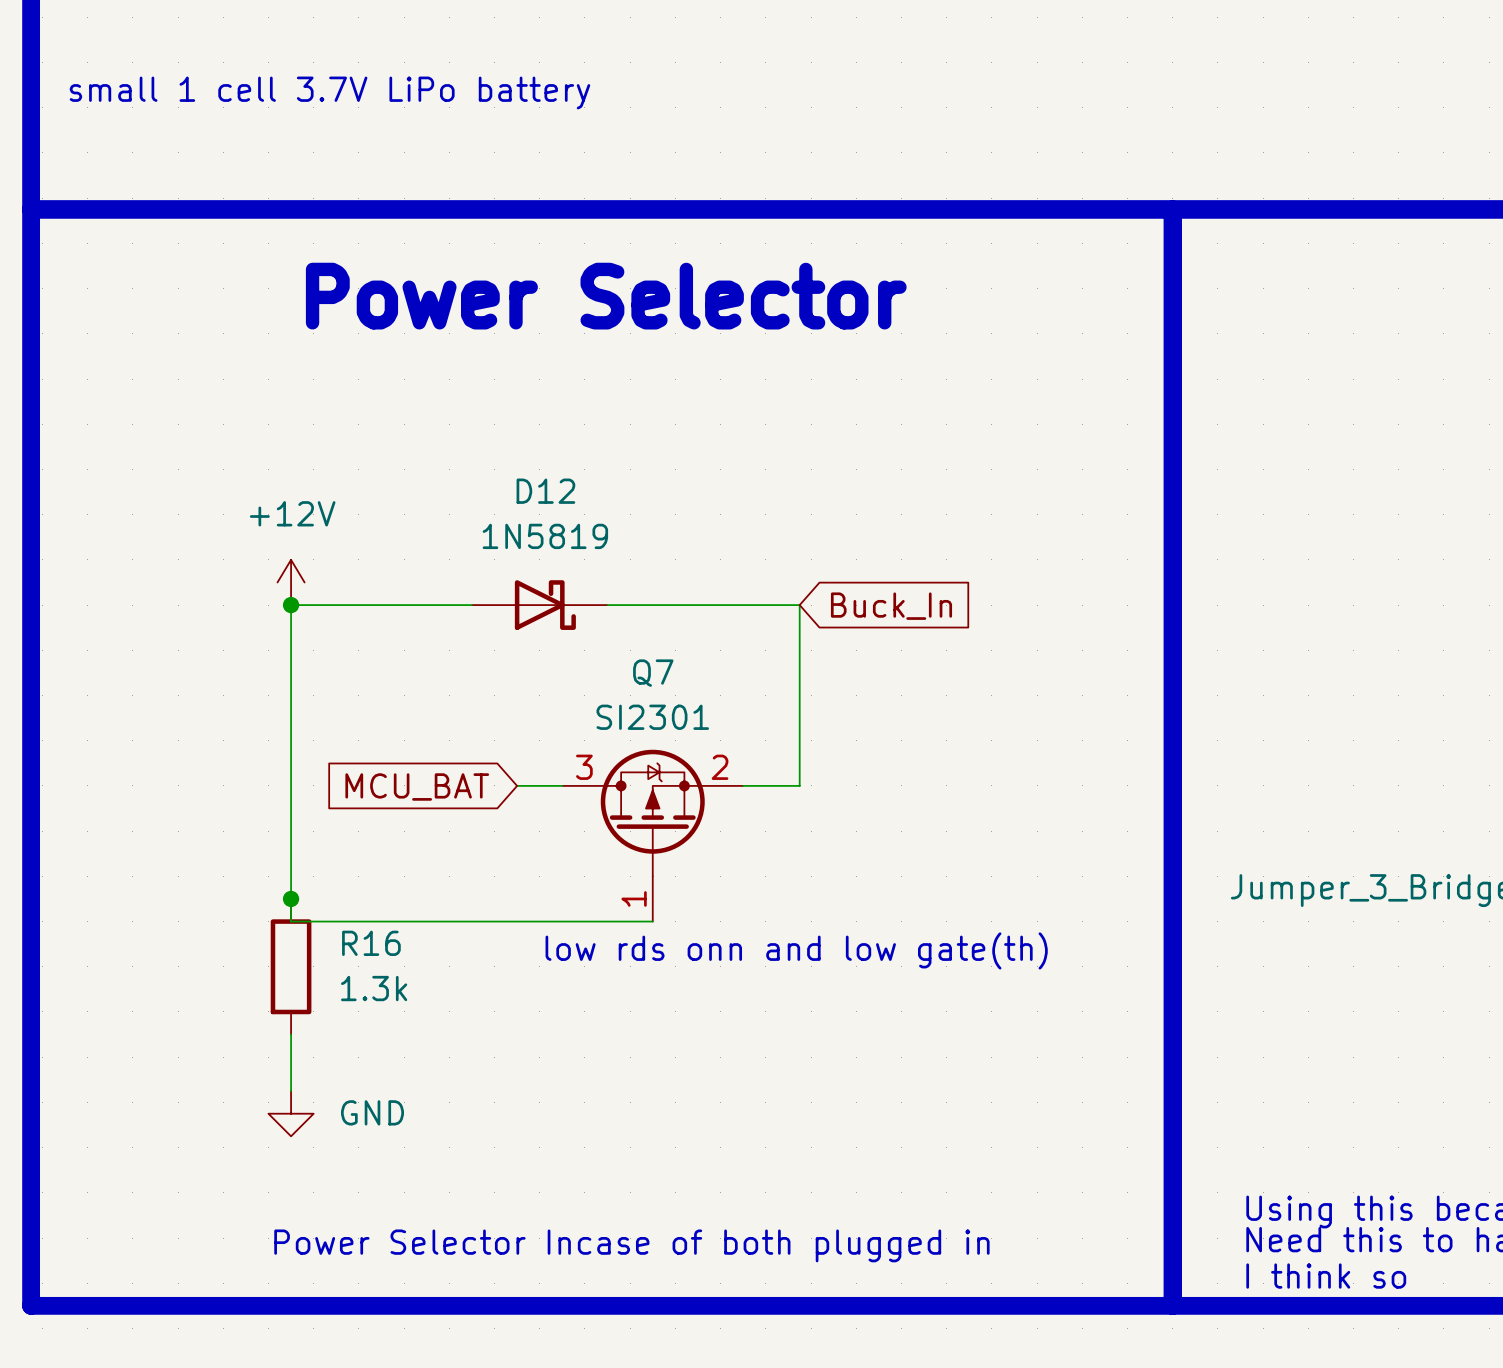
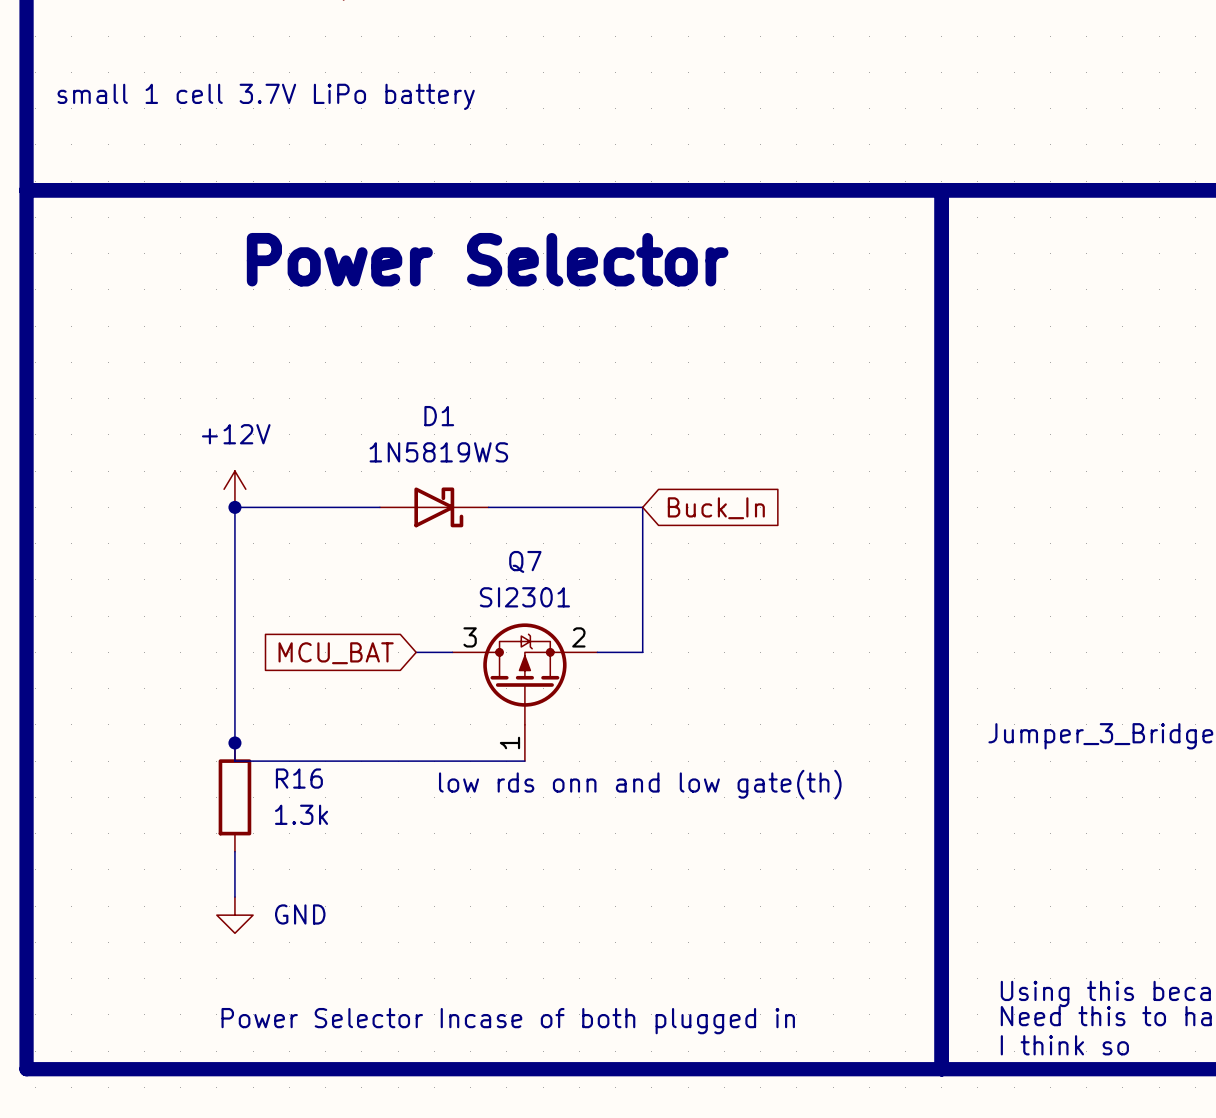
D12 name: D12 (545, 491) -> D1 (439, 416)
D12 value: 1N5819 (545, 536) -> 1N5819WS (438, 452)

